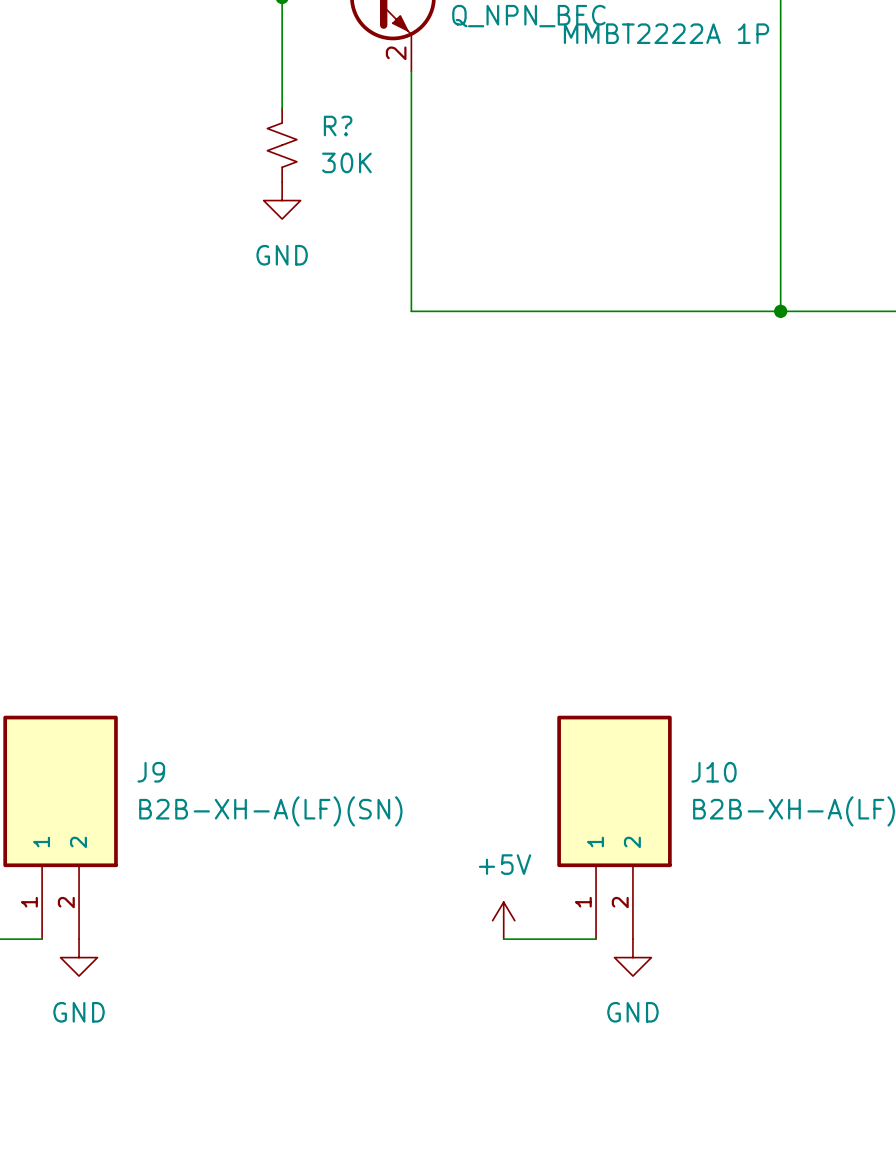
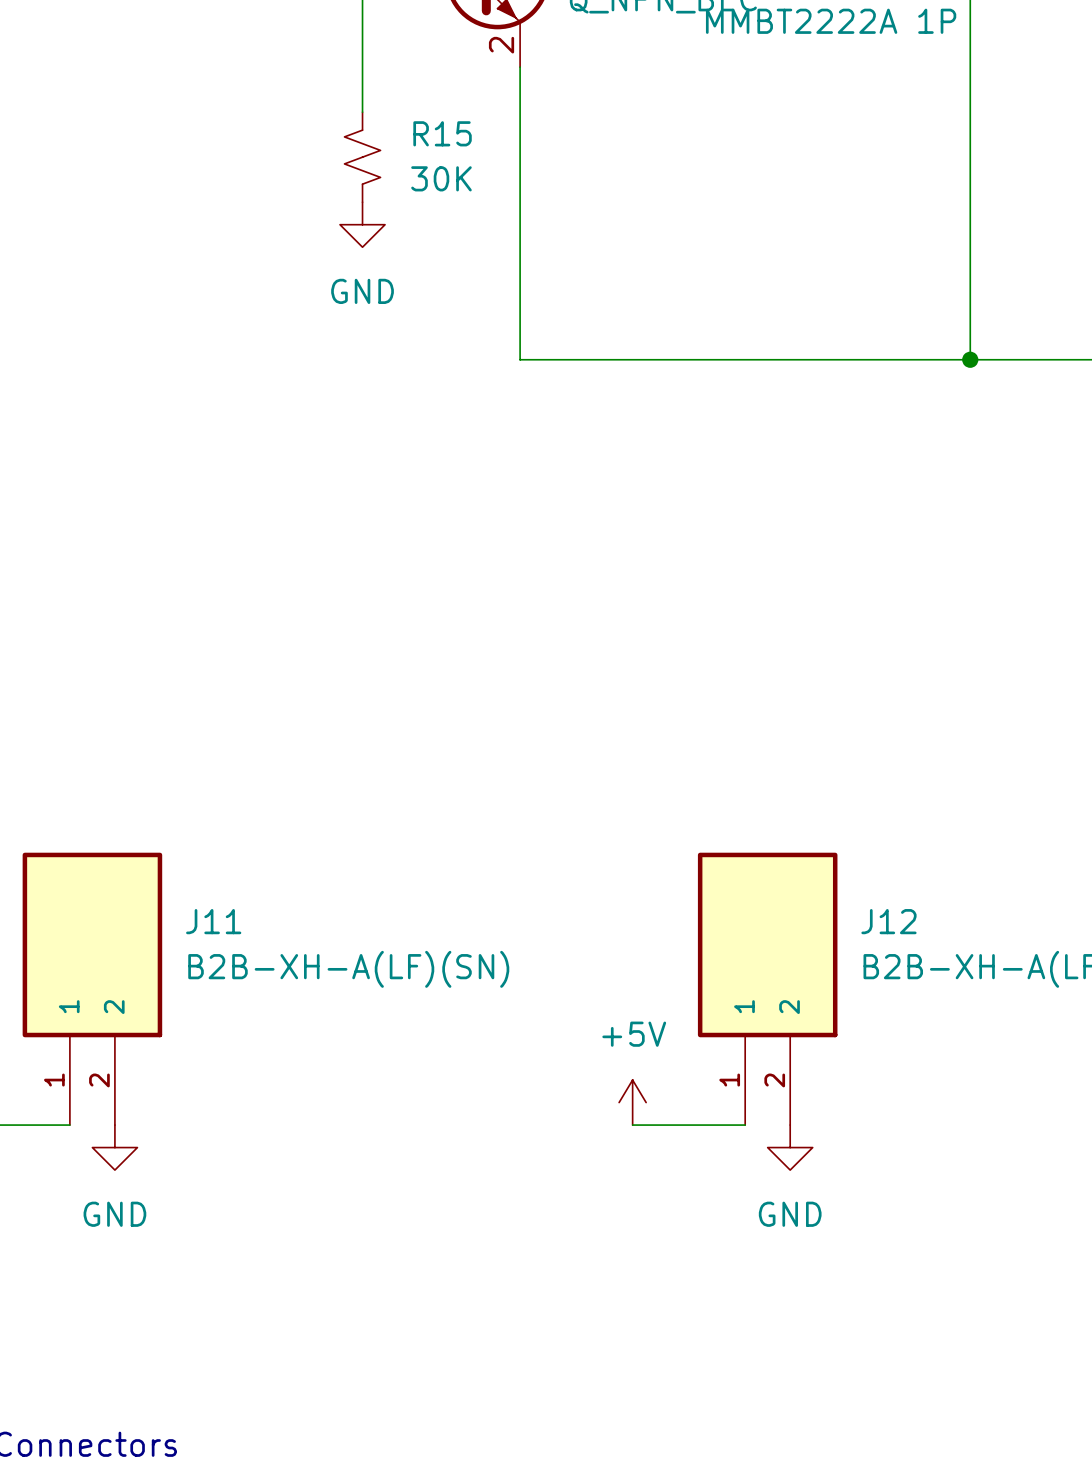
R? name: R? (338, 126) -> R15 (442, 133)
J9 name: J9 (151, 772) -> J11 (213, 921)
J10 name: J10 (713, 772) -> J12 (888, 921)

